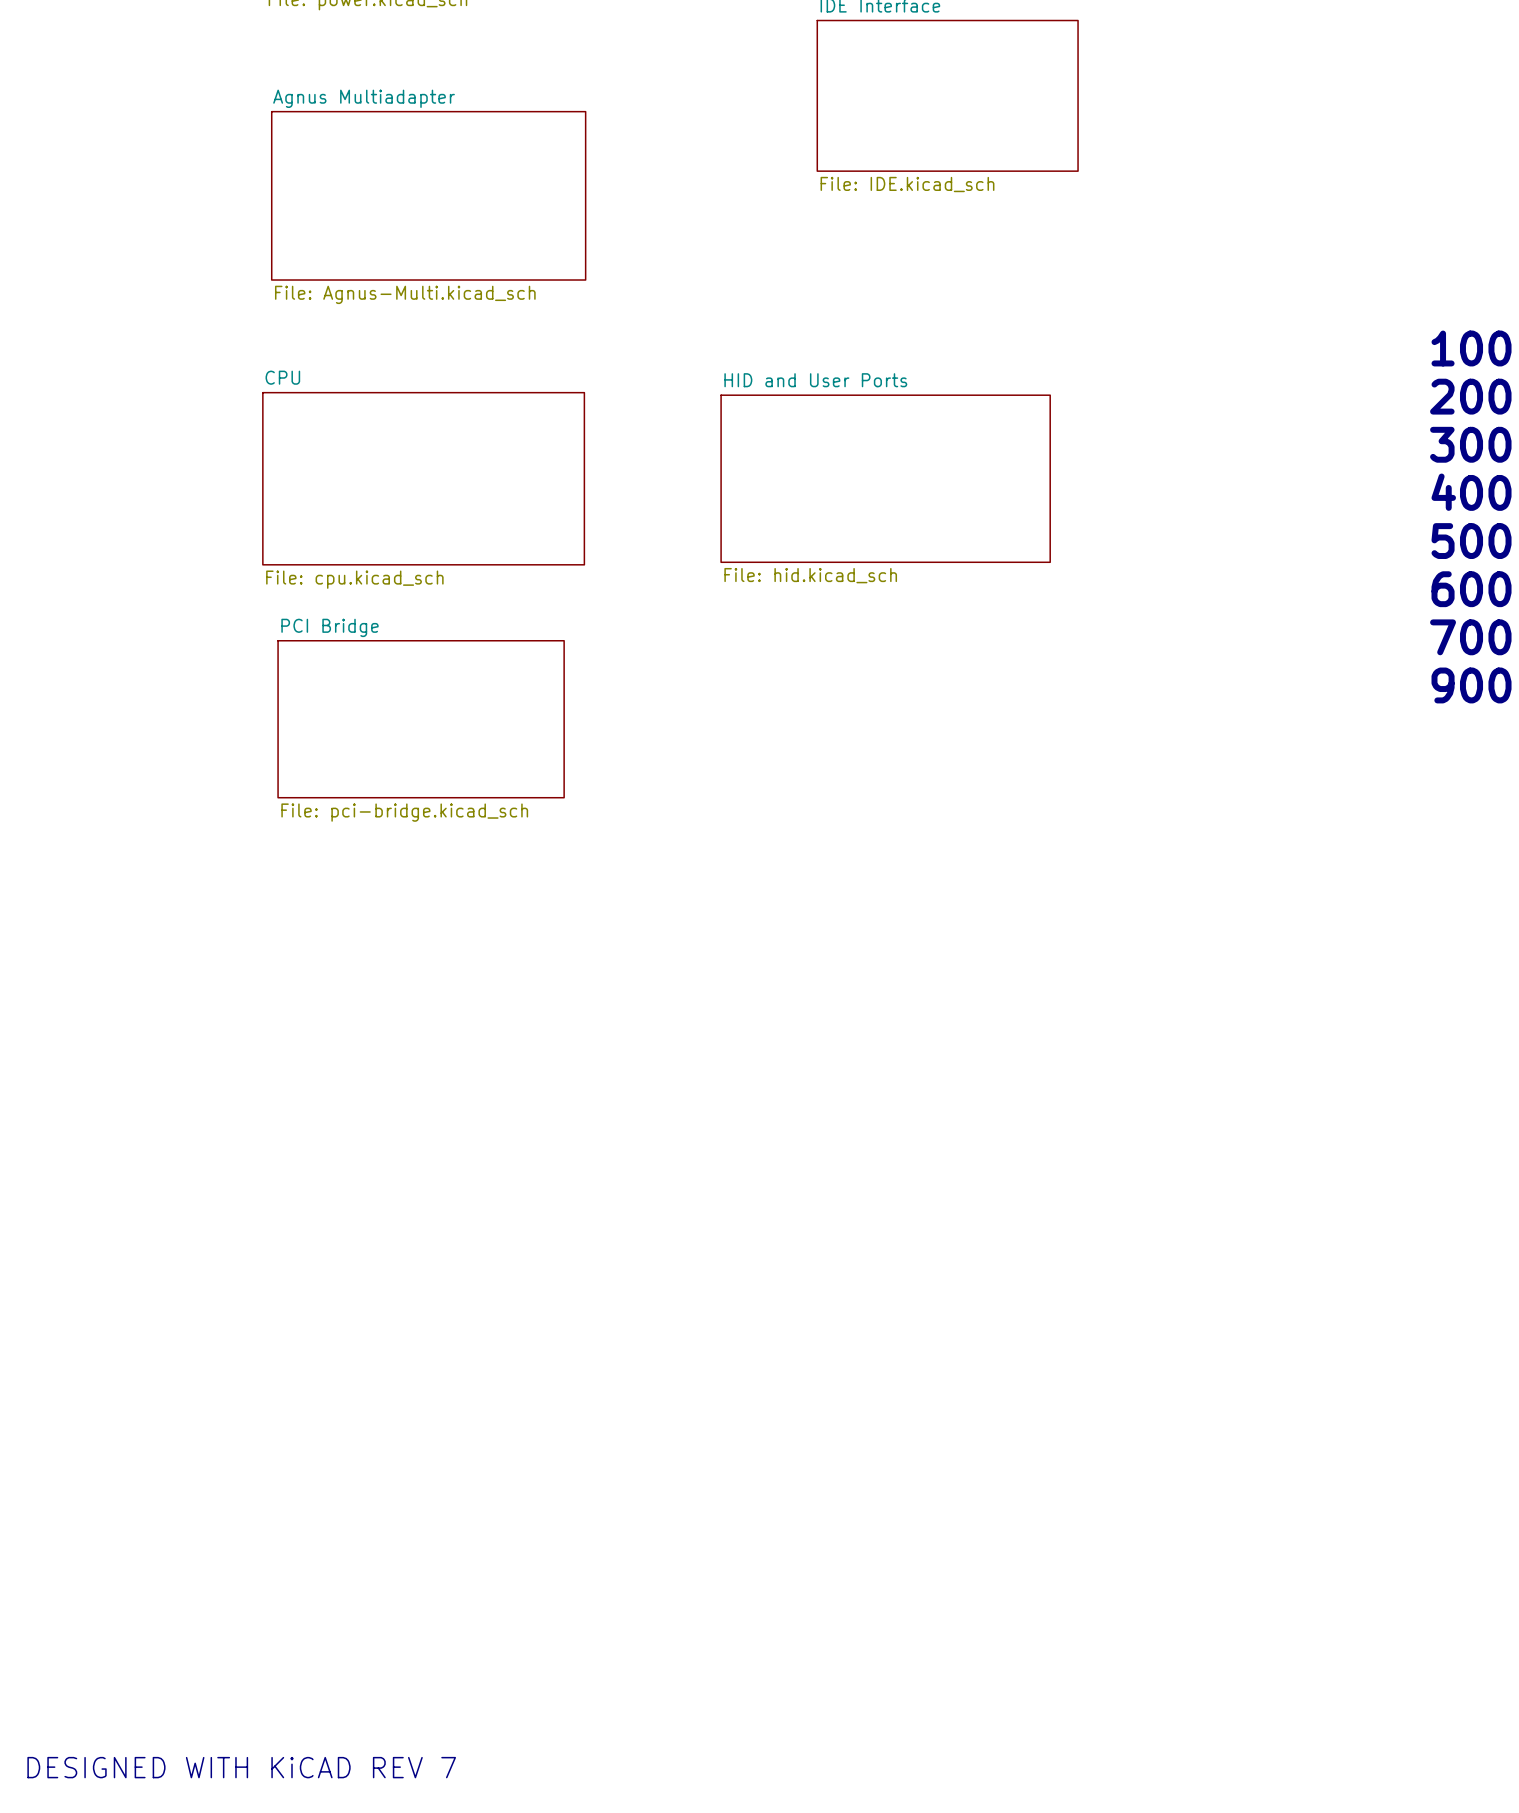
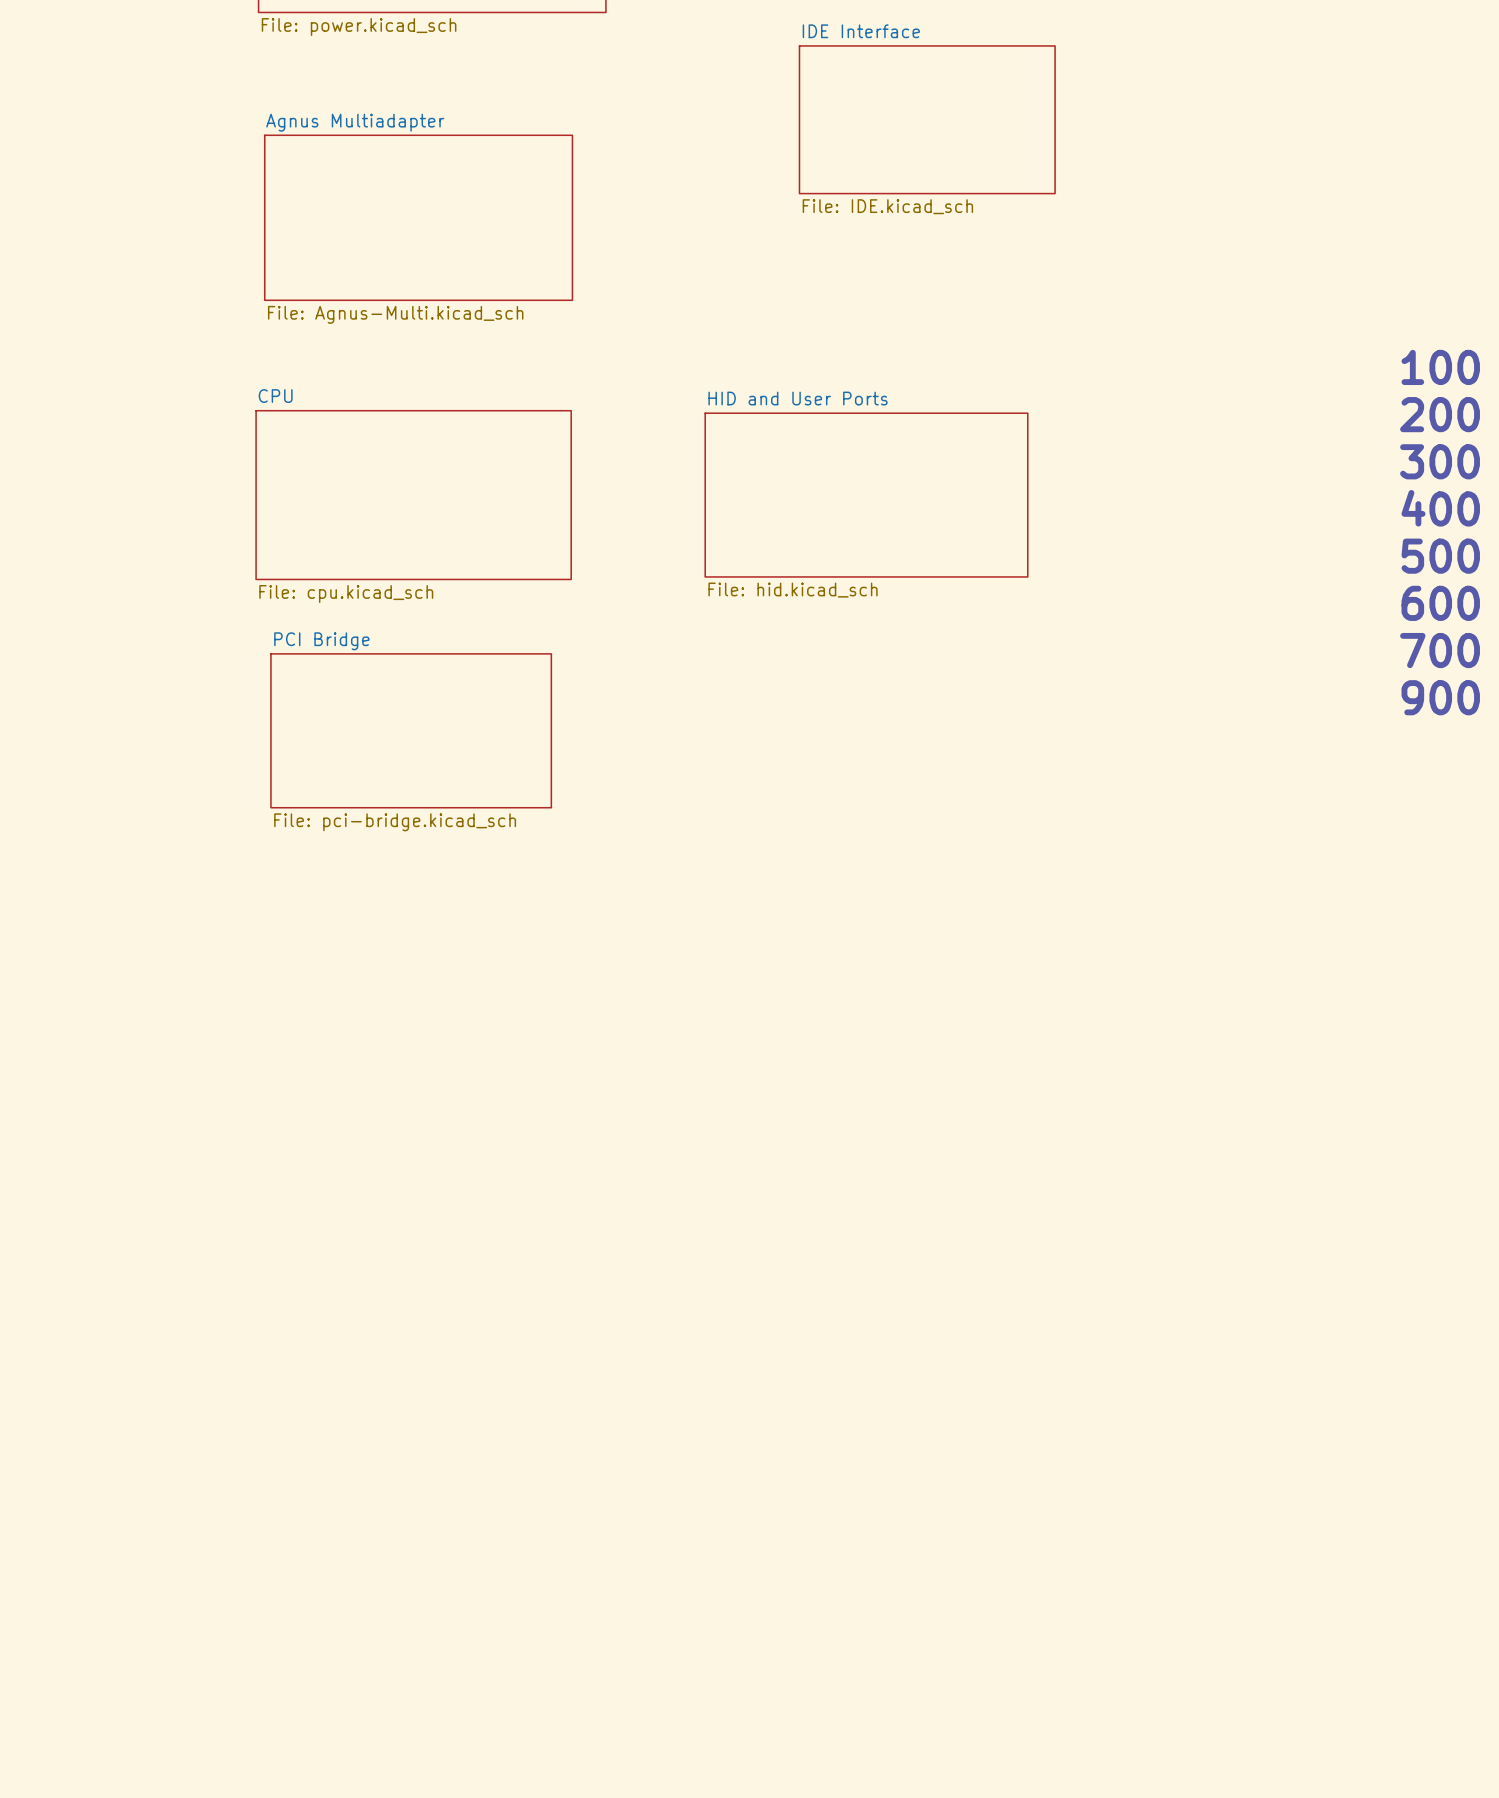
text: DESIGNED WITH KiCAD REV 7 (241, 1767) -> none

